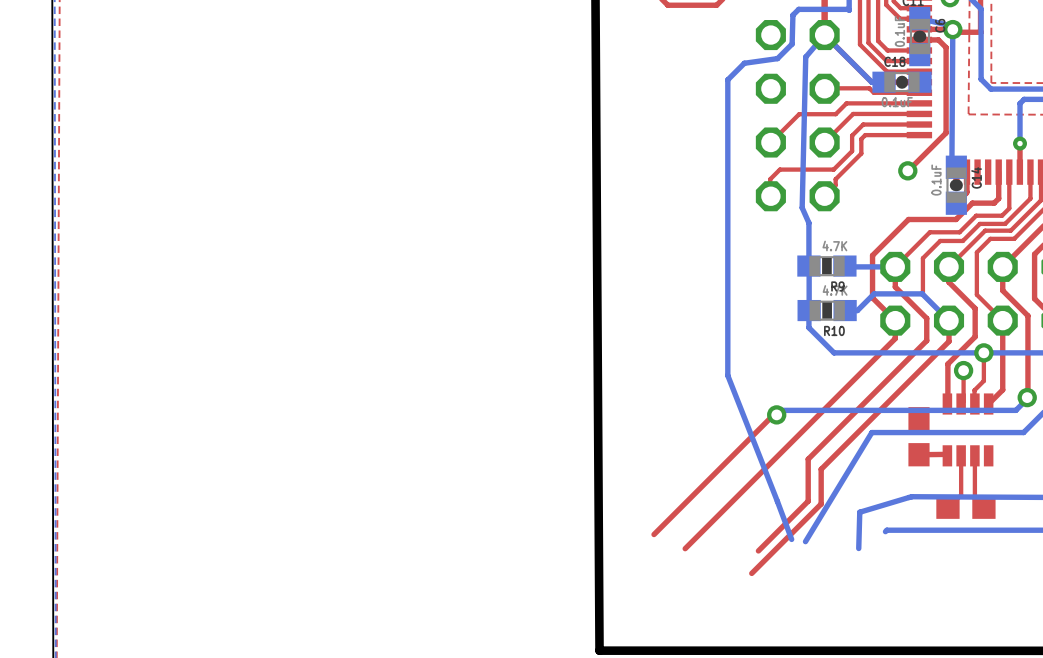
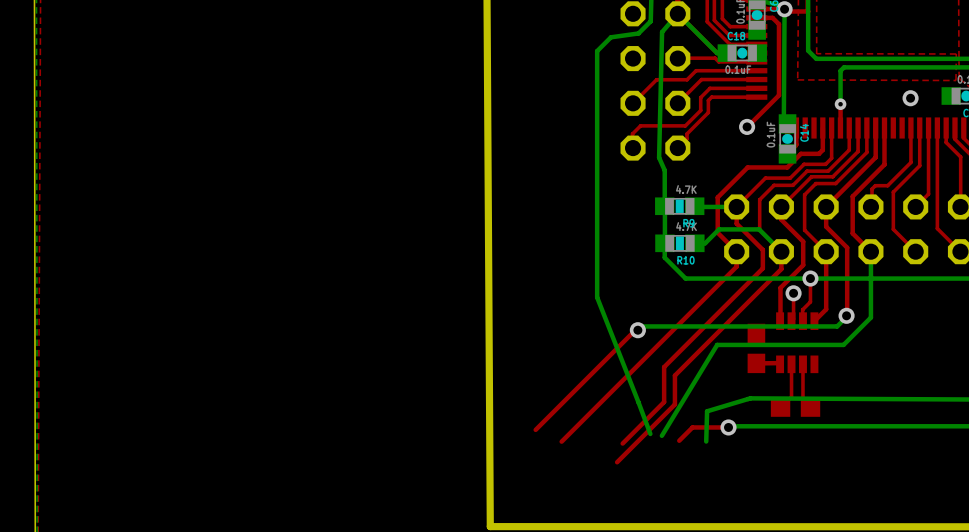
top track: none -> (728, 427) (692, 427) (679, 440)
via: none -> (728, 427)

